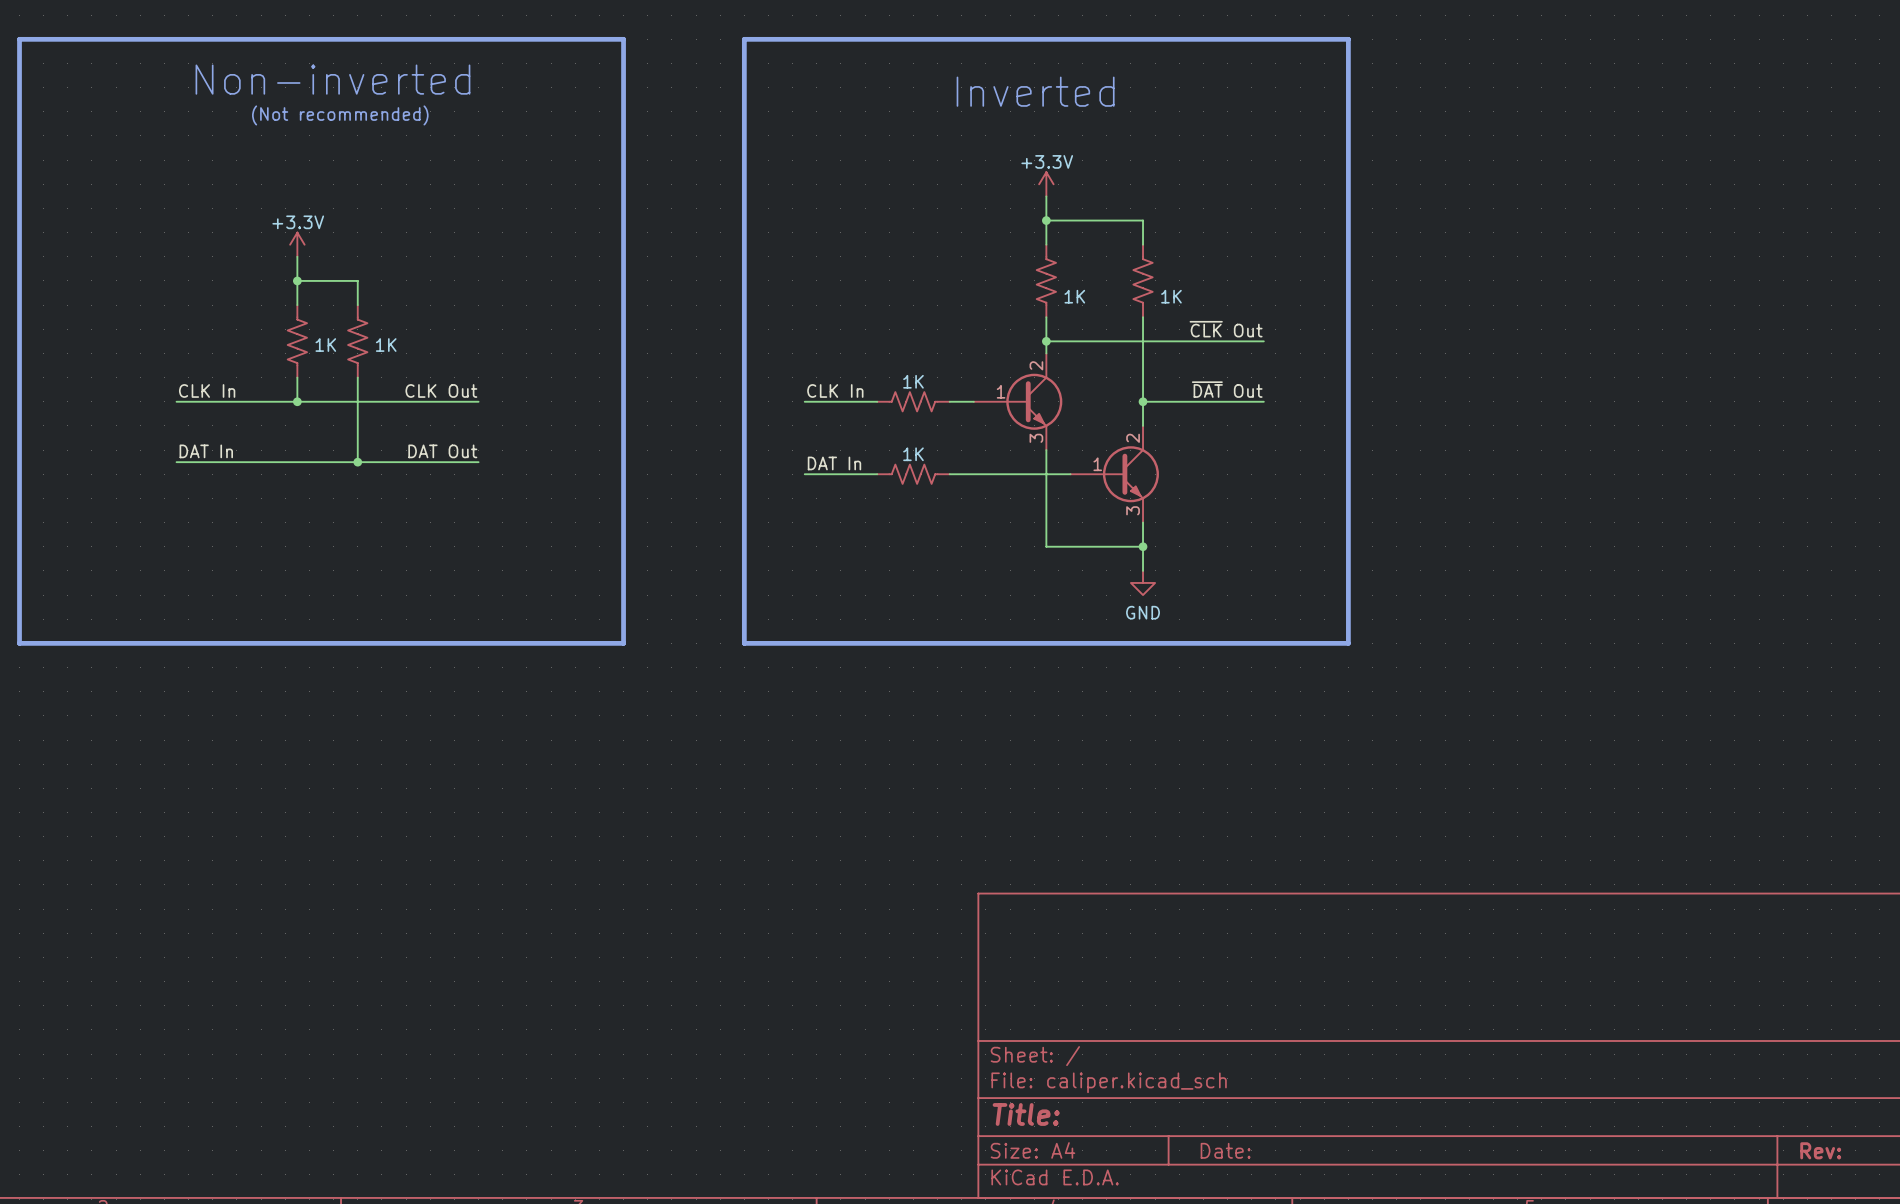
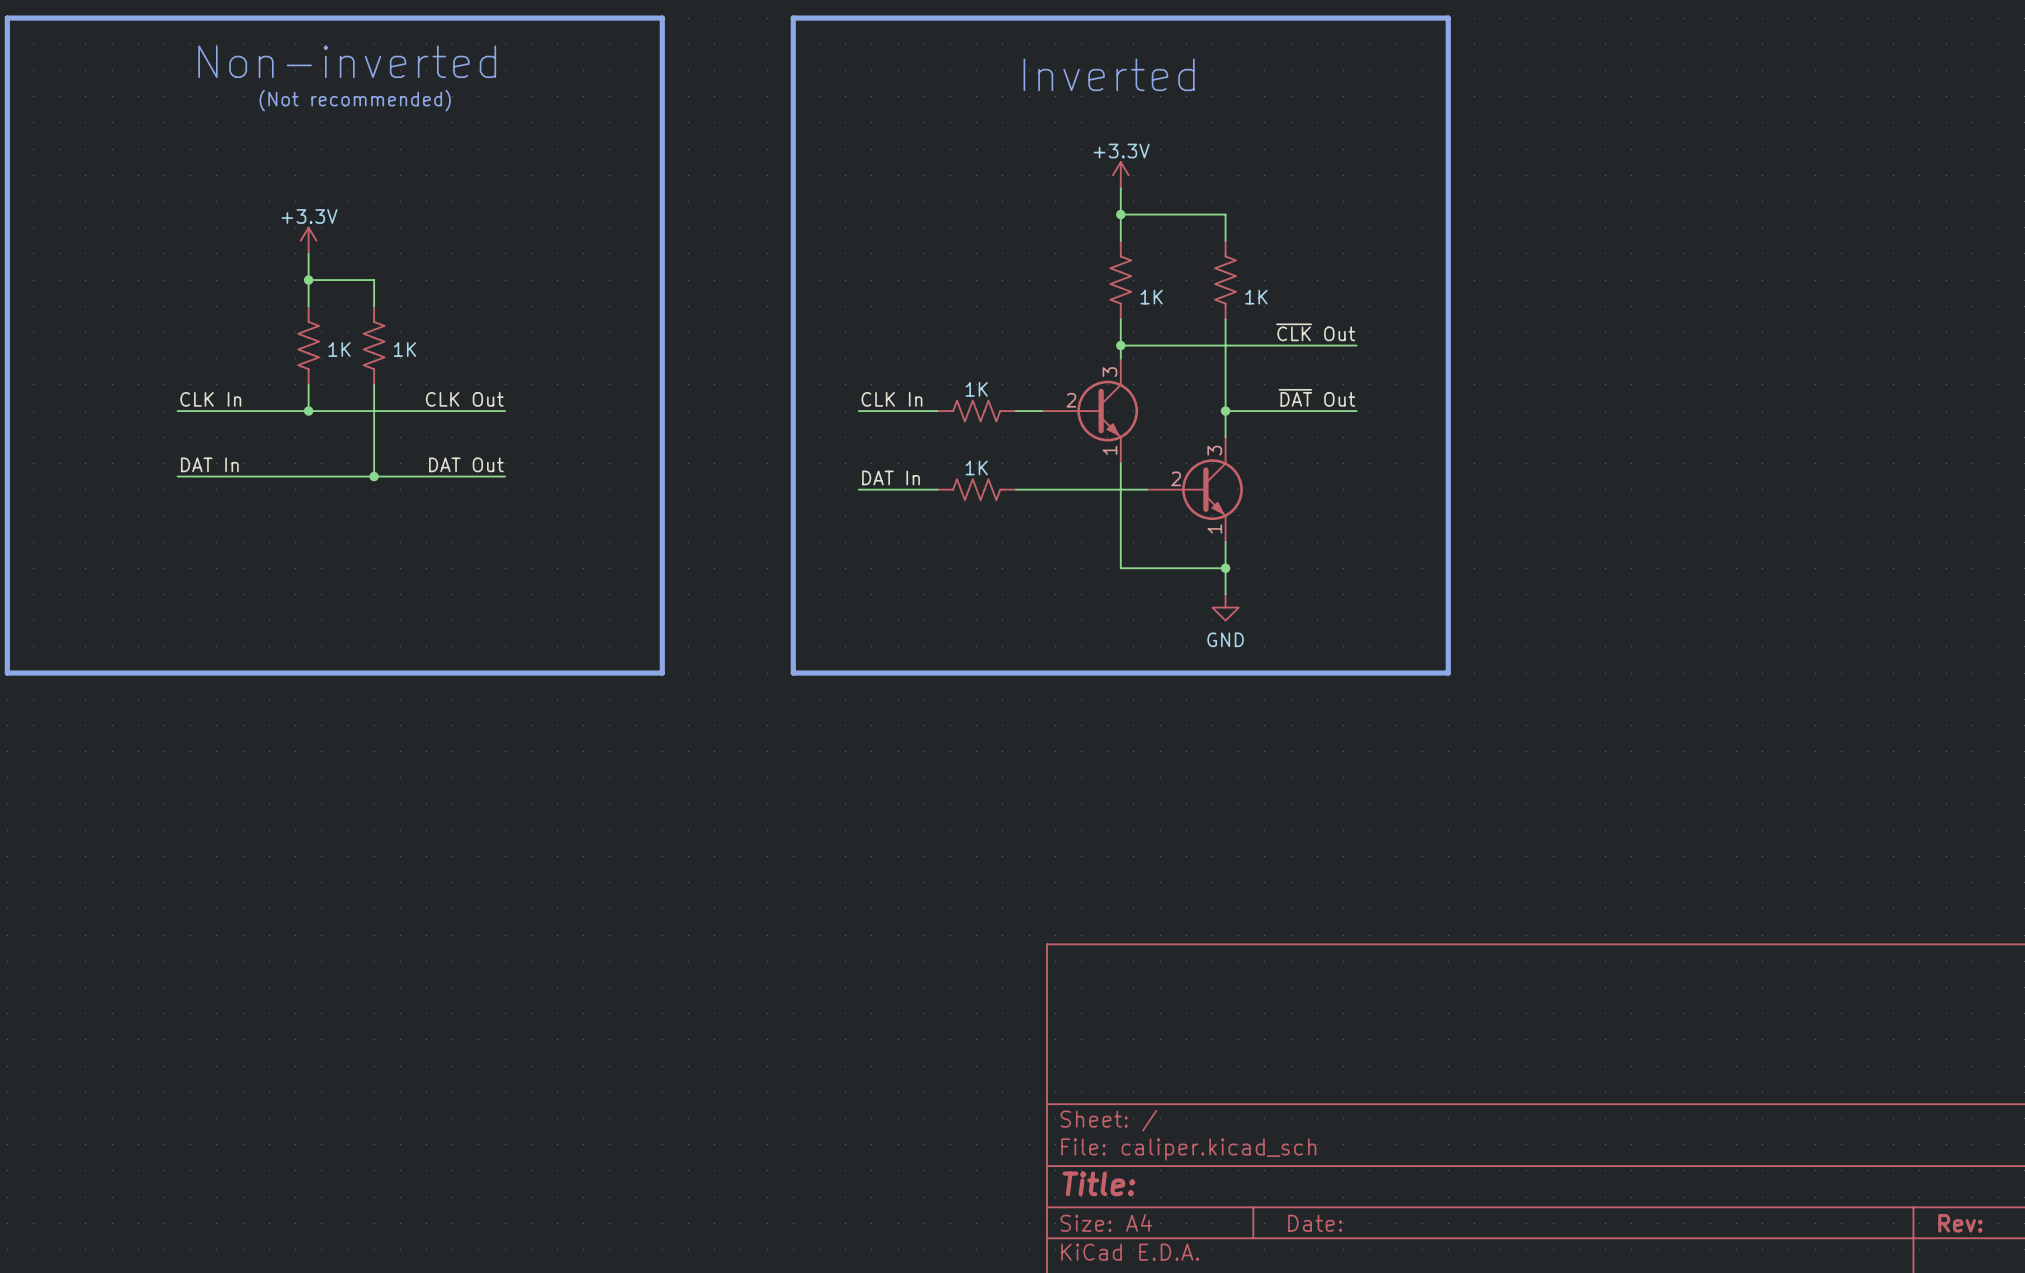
part pin number: 2 (1036, 365) -> 3 (1109, 372)
part pin number: 1 (1001, 391) -> 2 (1071, 400)
part pin number: 3 (1036, 438) -> 1 (1109, 450)
part pin number: 2 (1133, 438) -> 3 (1214, 450)
part pin number: 1 (1097, 464) -> 2 (1176, 478)
part pin number: 3 (1133, 510) -> 1 (1214, 528)

